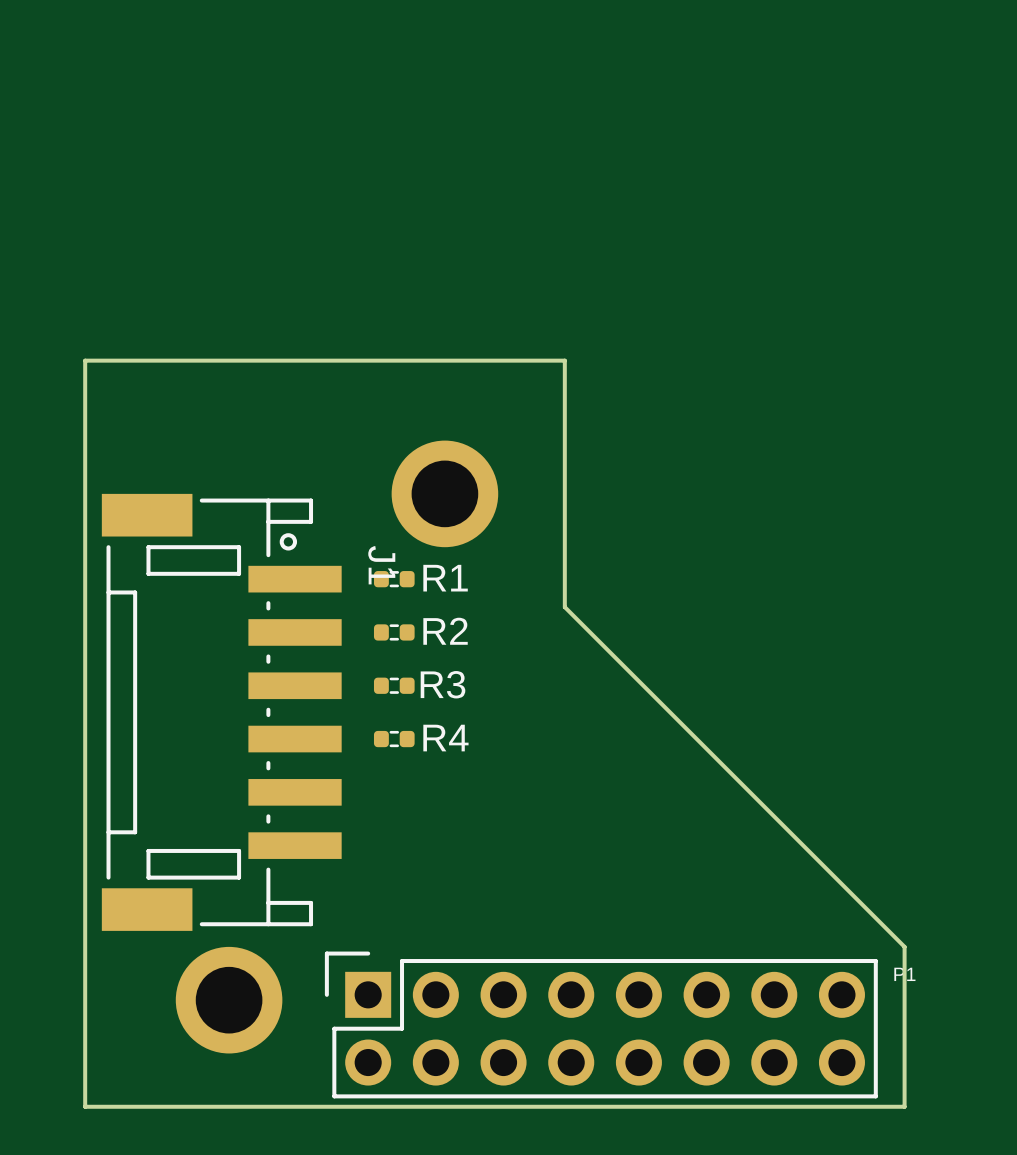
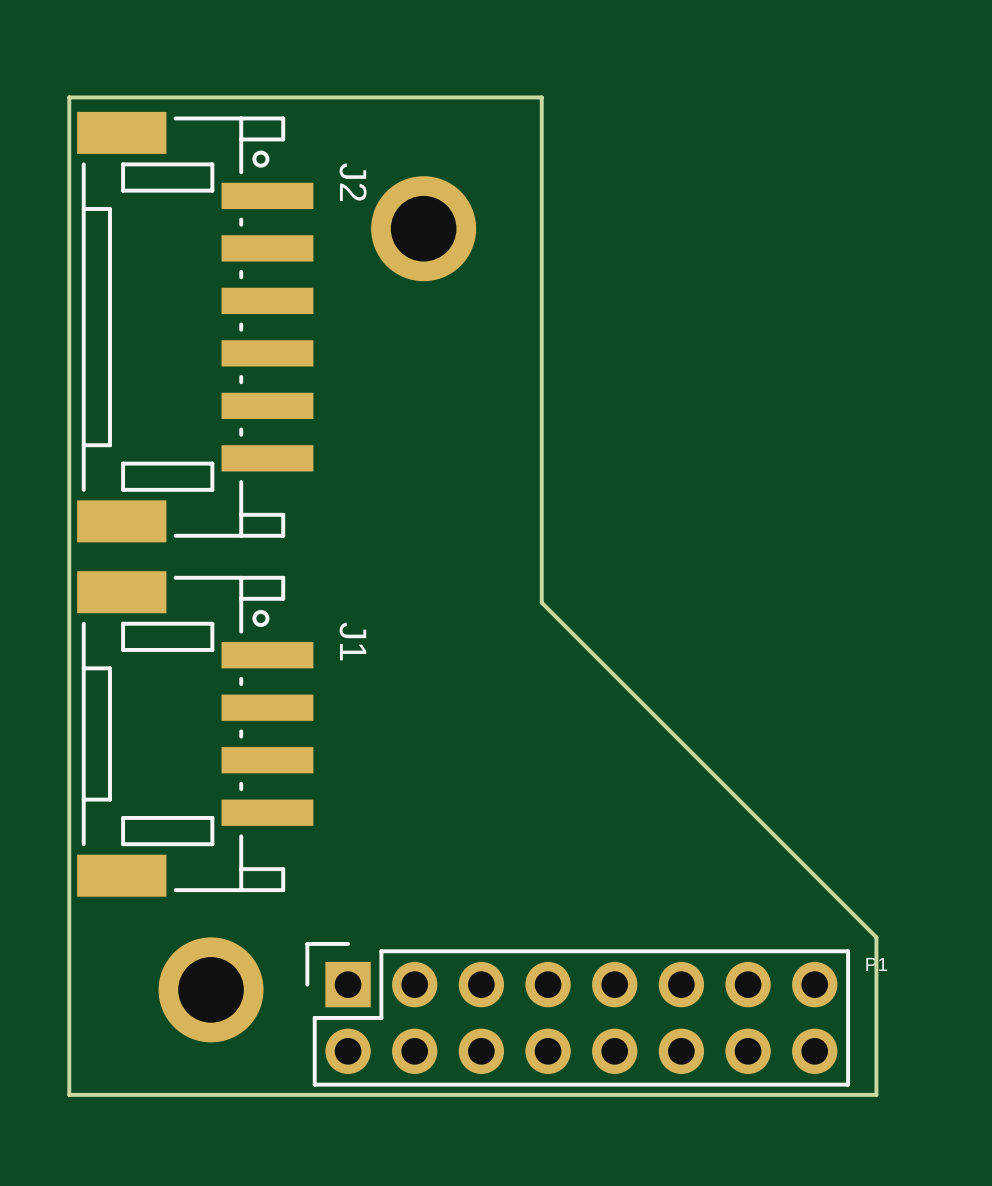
J2: none -> (195, 327)
board edge: (564, 360) (85, 360) -> (541, 359) (541, 97) (69, 97) (69, 359)
J1 footprint: [101, 493, 342, 931] -> [77, 571, 314, 897]
part position: (444, 493) -> (423, 228)
R1: (394, 579) -> none
R2: (394, 632) -> none
R3: (394, 685) -> none
R4: (394, 739) -> none

